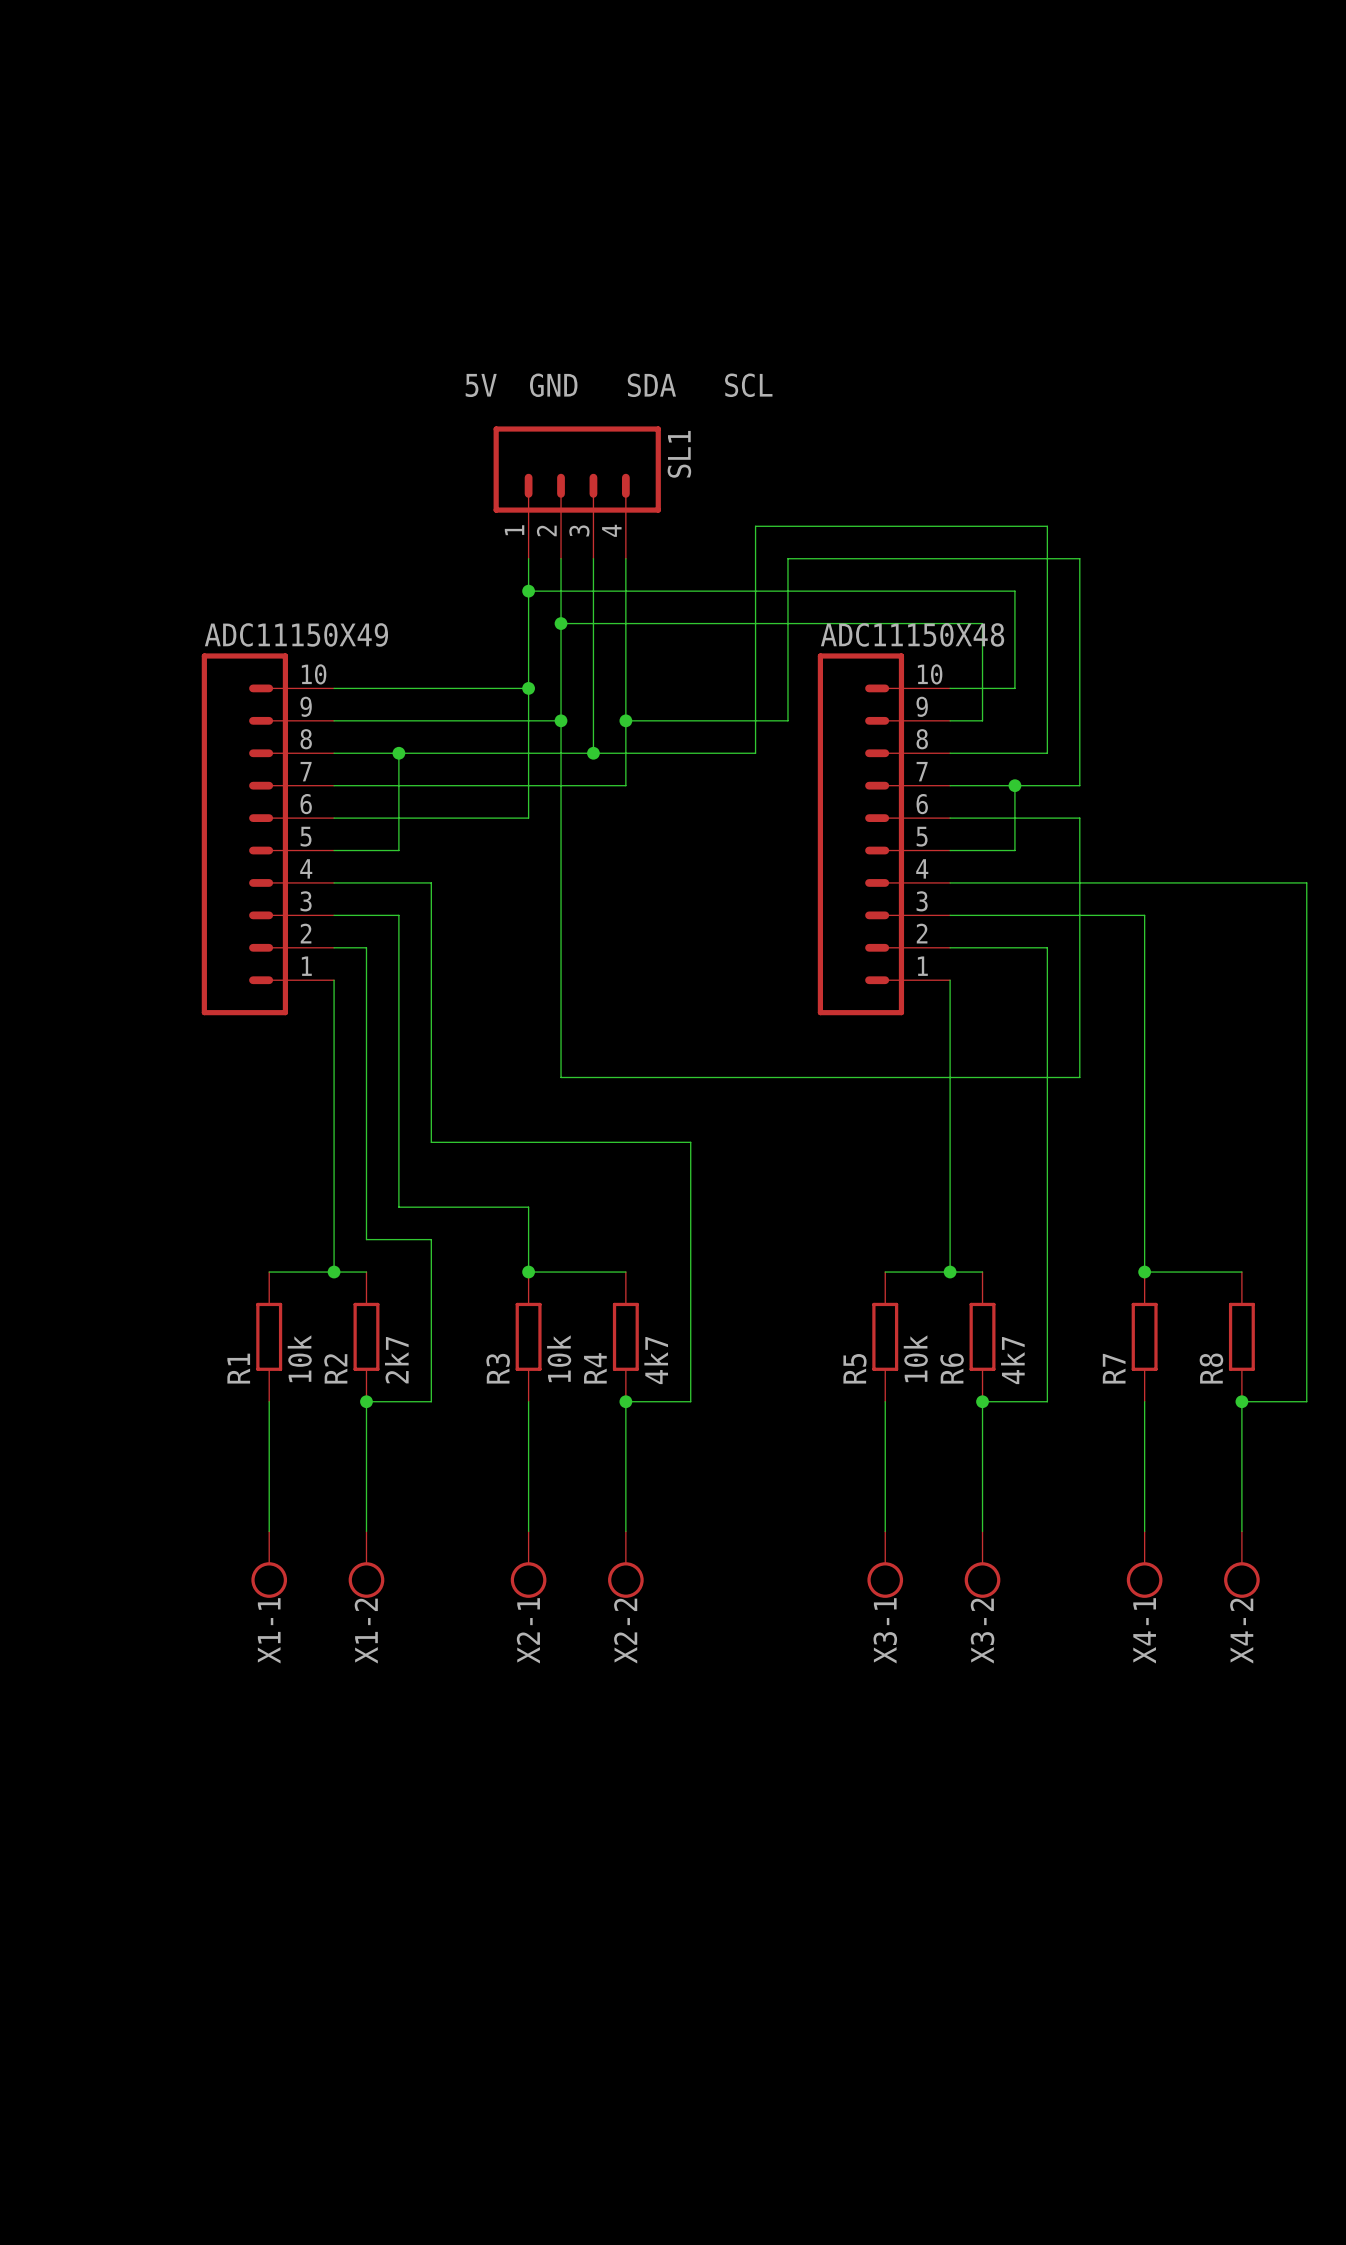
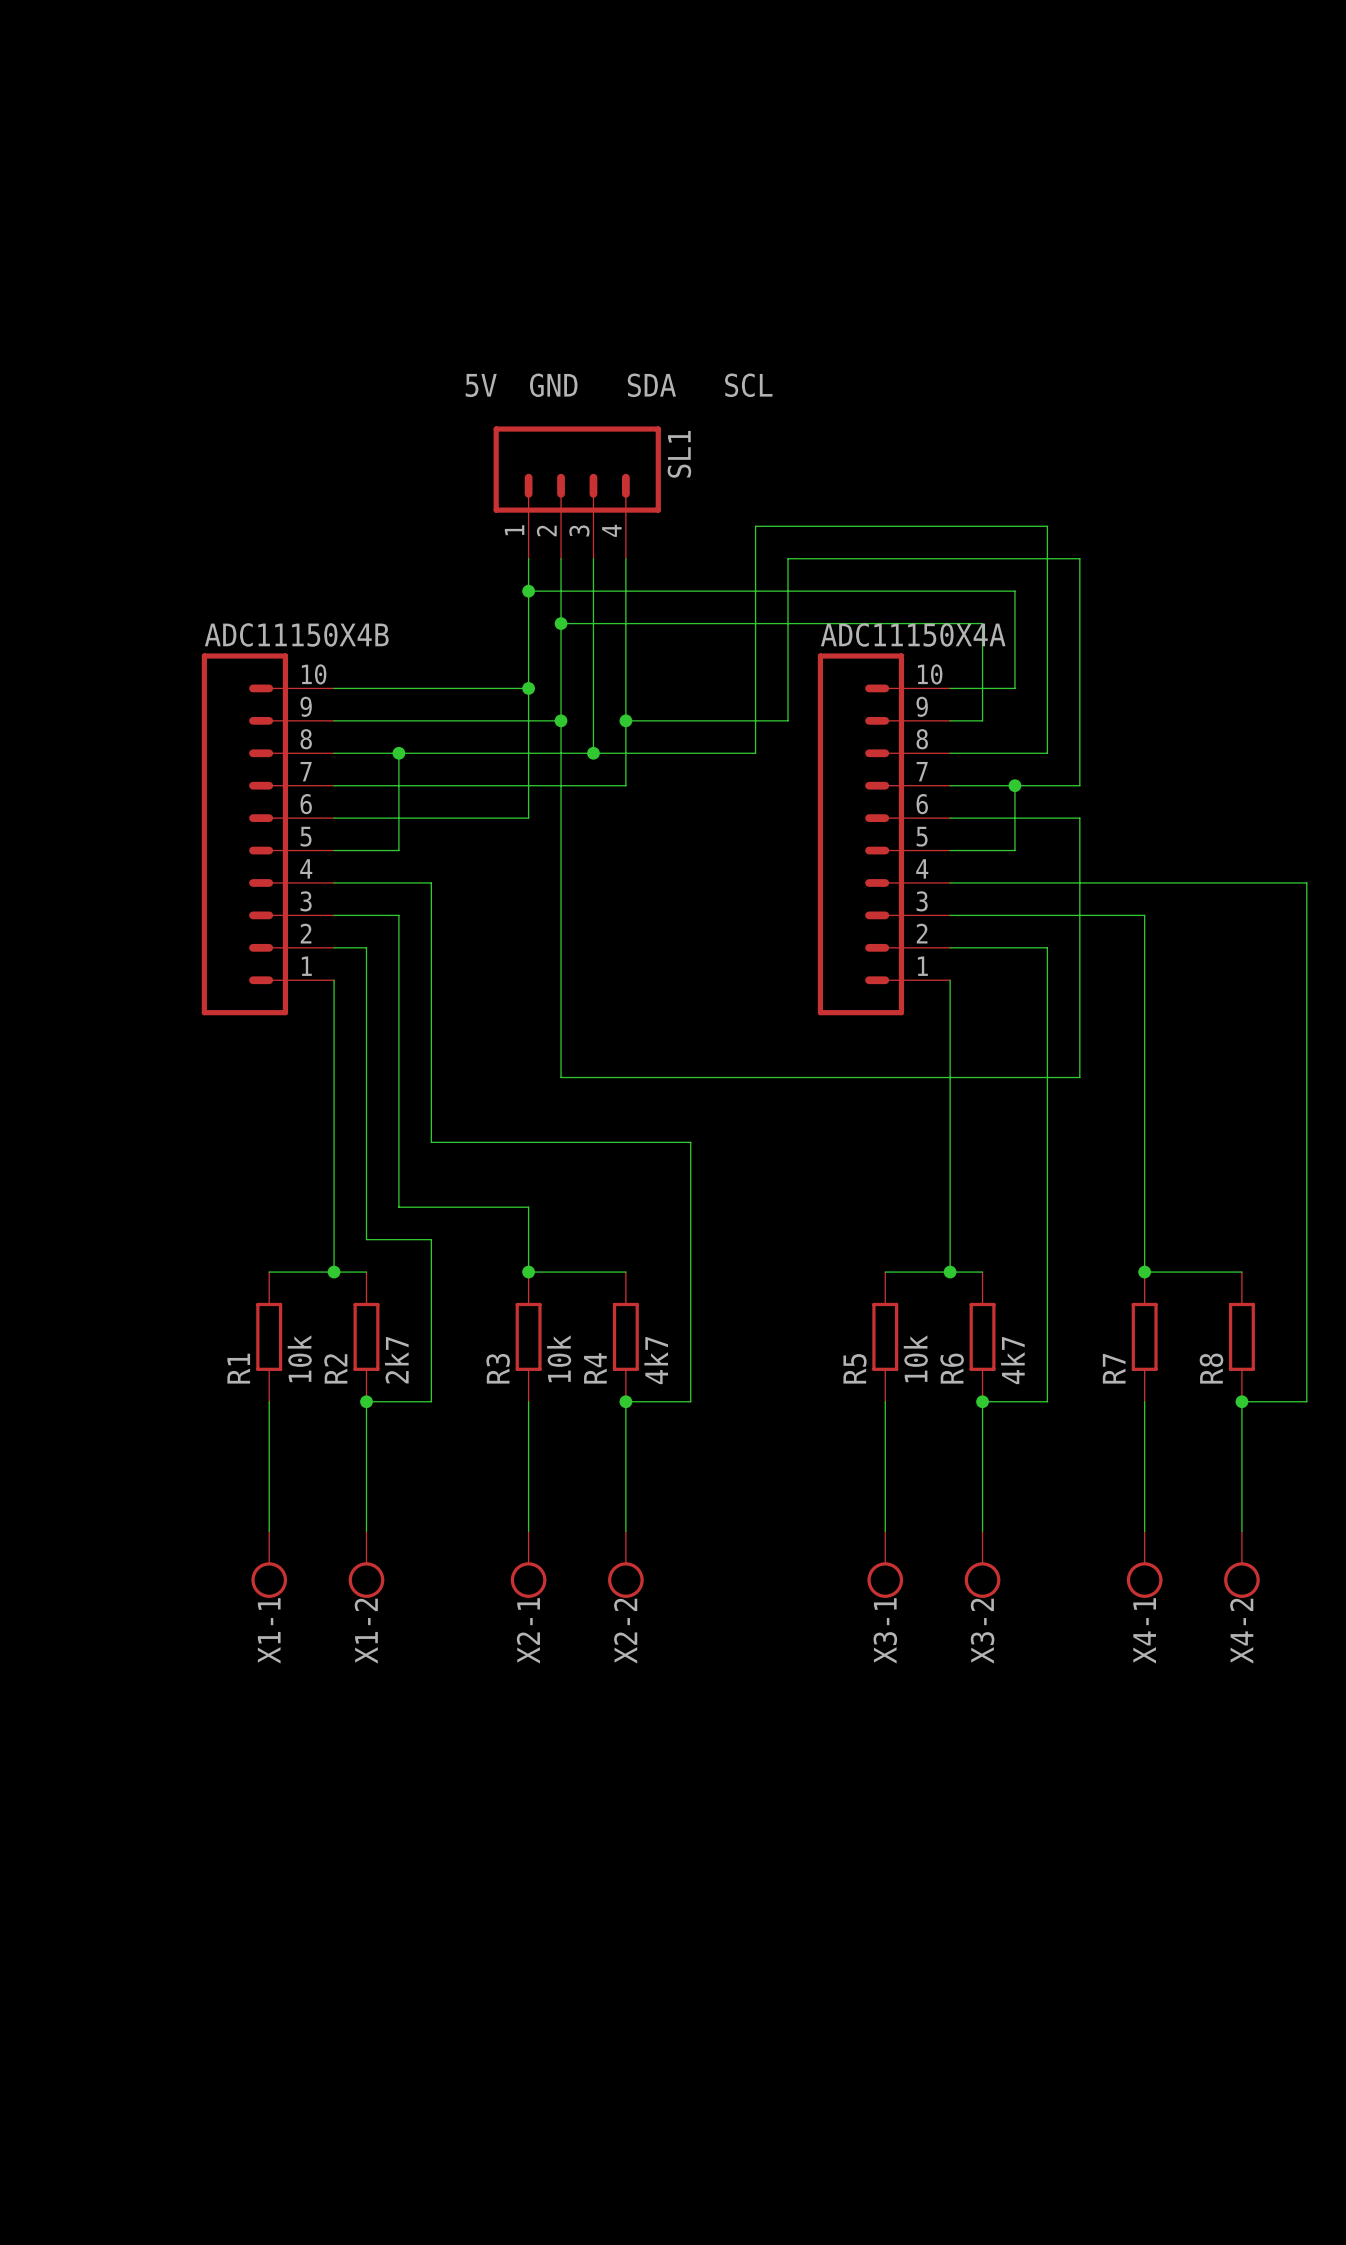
ADC11150X49 name: ADC11150X49 (296, 634) -> ADC11150X4B (296, 634)
ADC11150X48 name: ADC11150X48 (912, 634) -> ADC11150X4A (913, 634)

